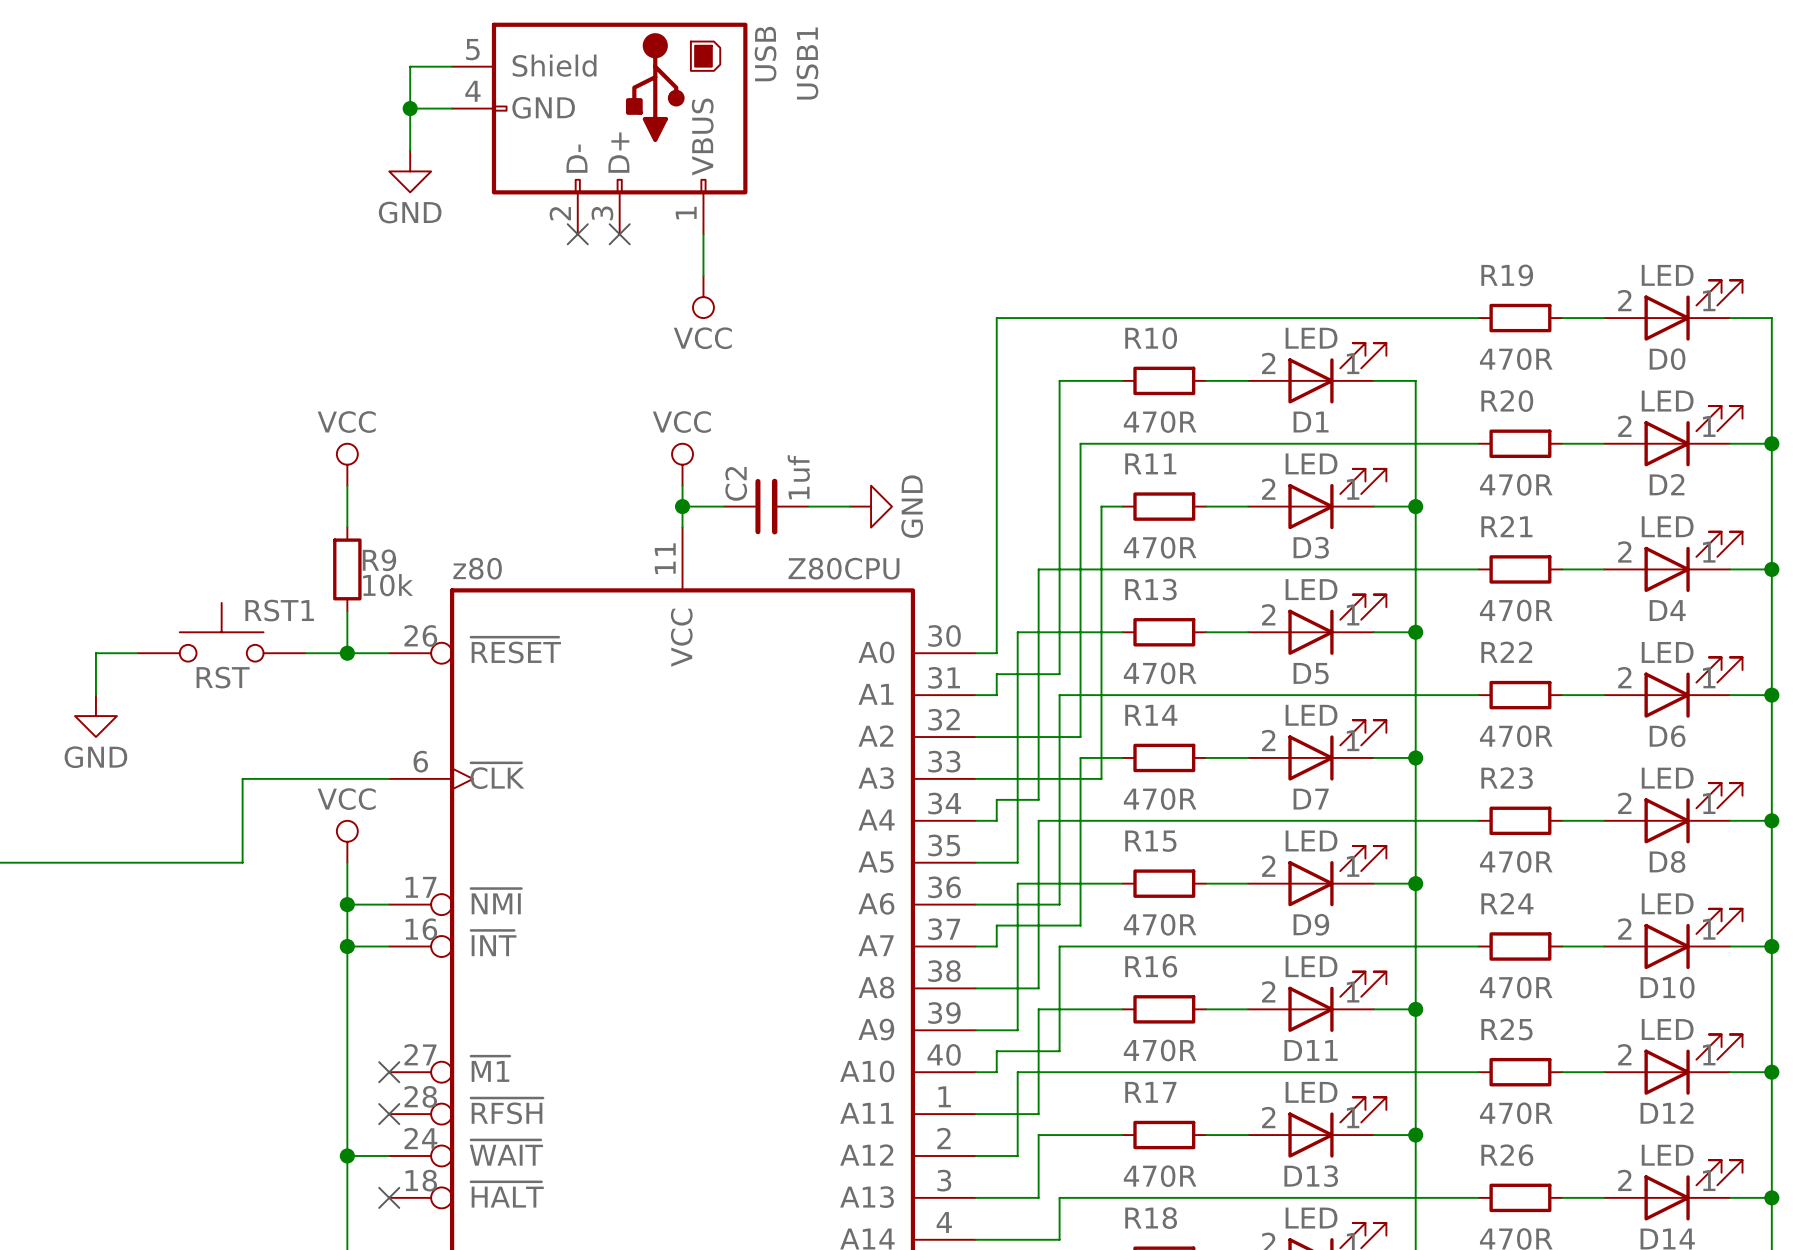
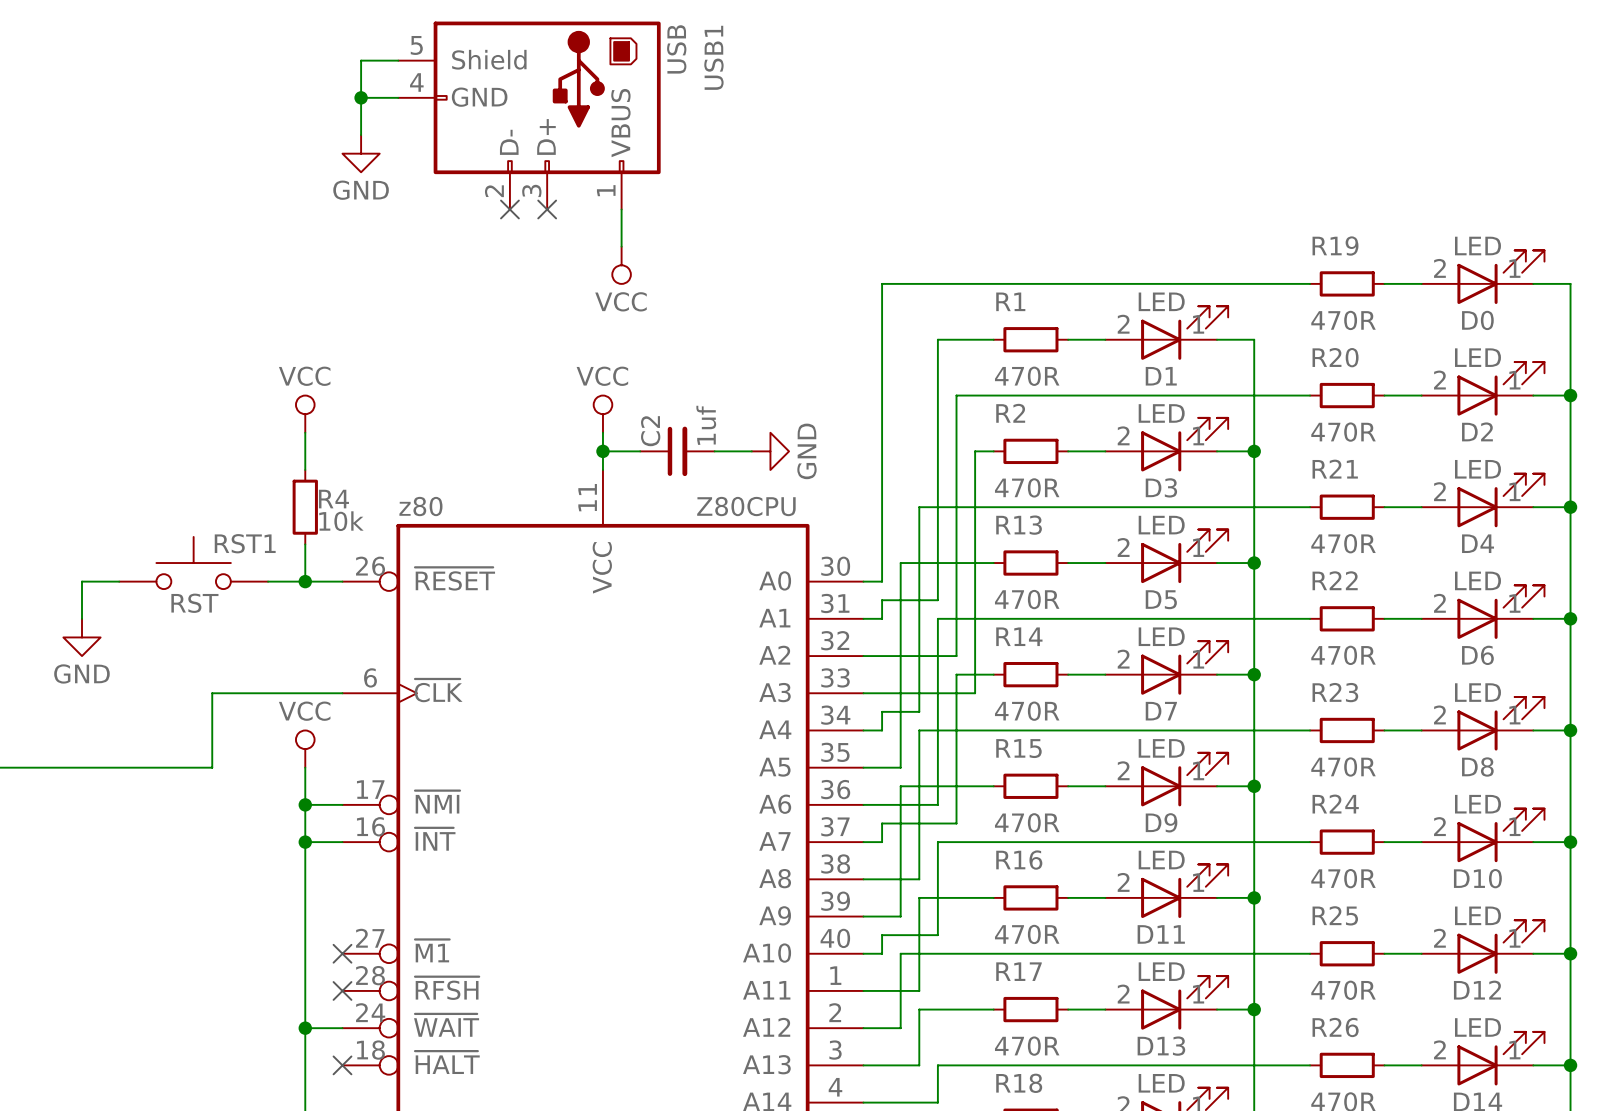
R10 name: R10 (1151, 338) -> R1 (1010, 301)
R11 name: R11 (1150, 463) -> R2 (1010, 413)
R9 name: R9 (379, 560) -> R4 (333, 499)

